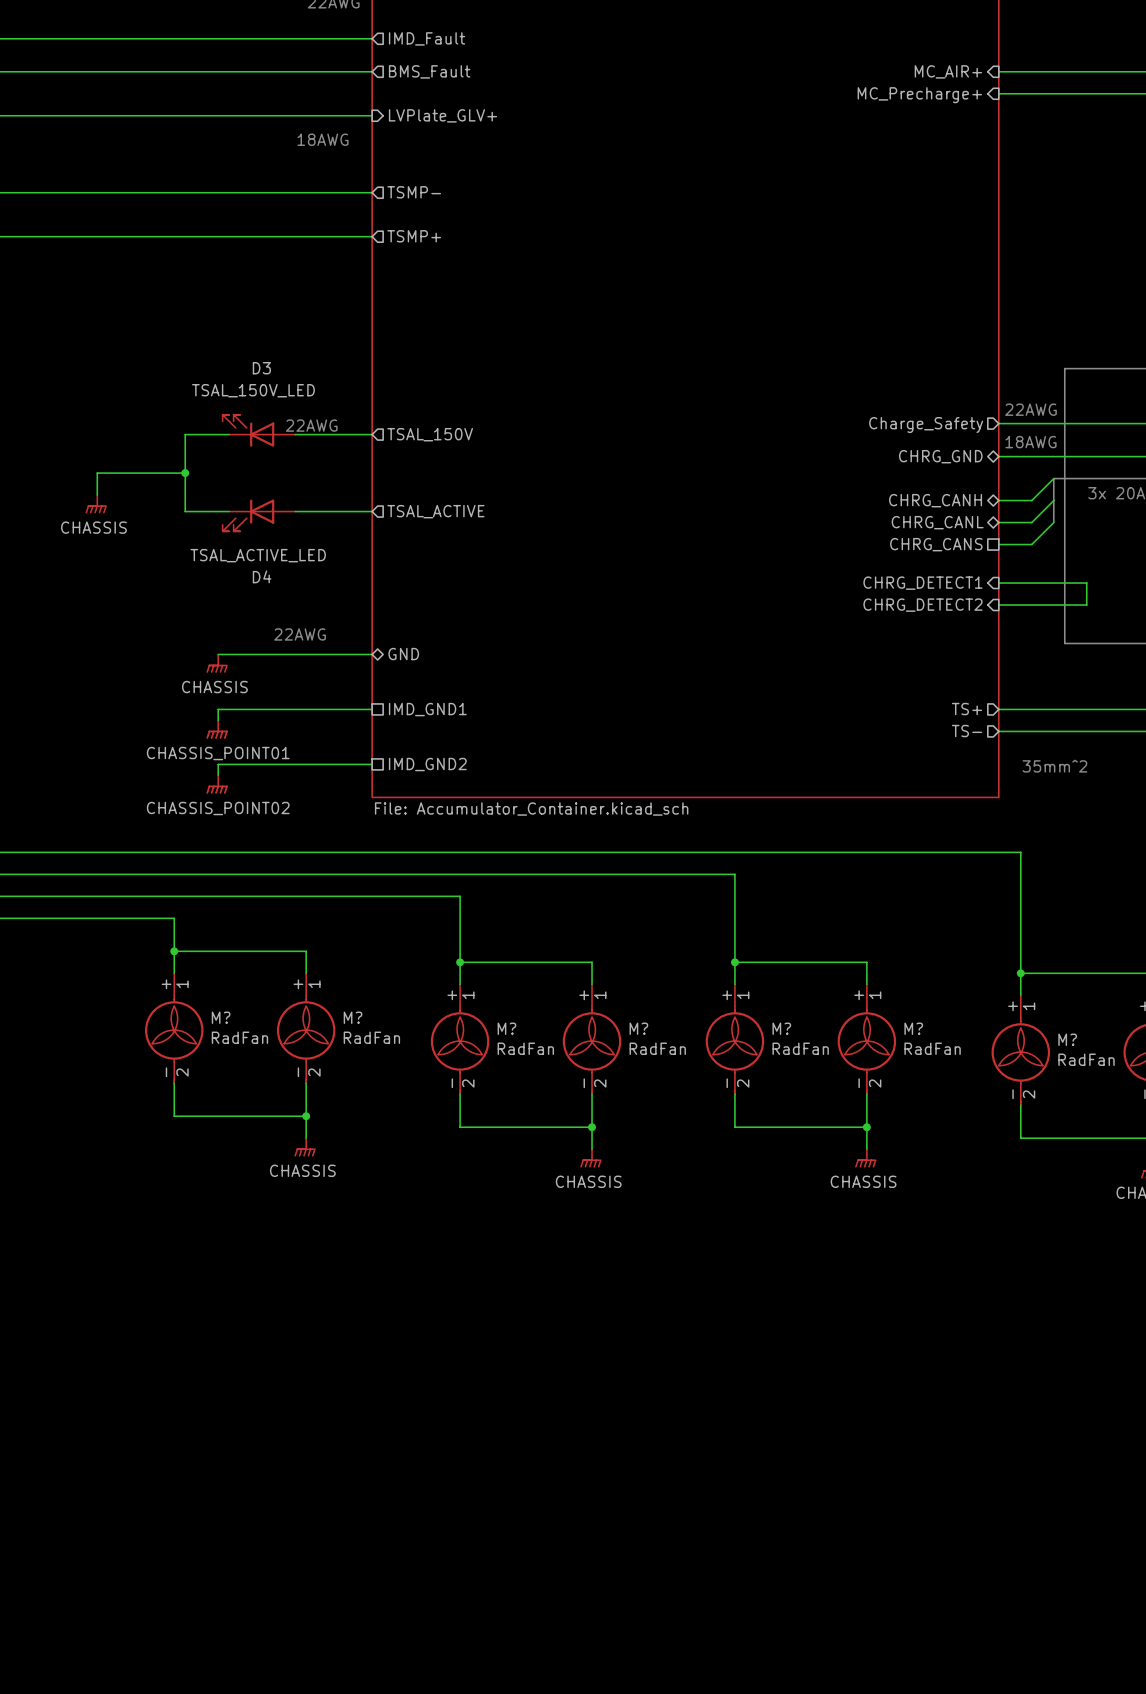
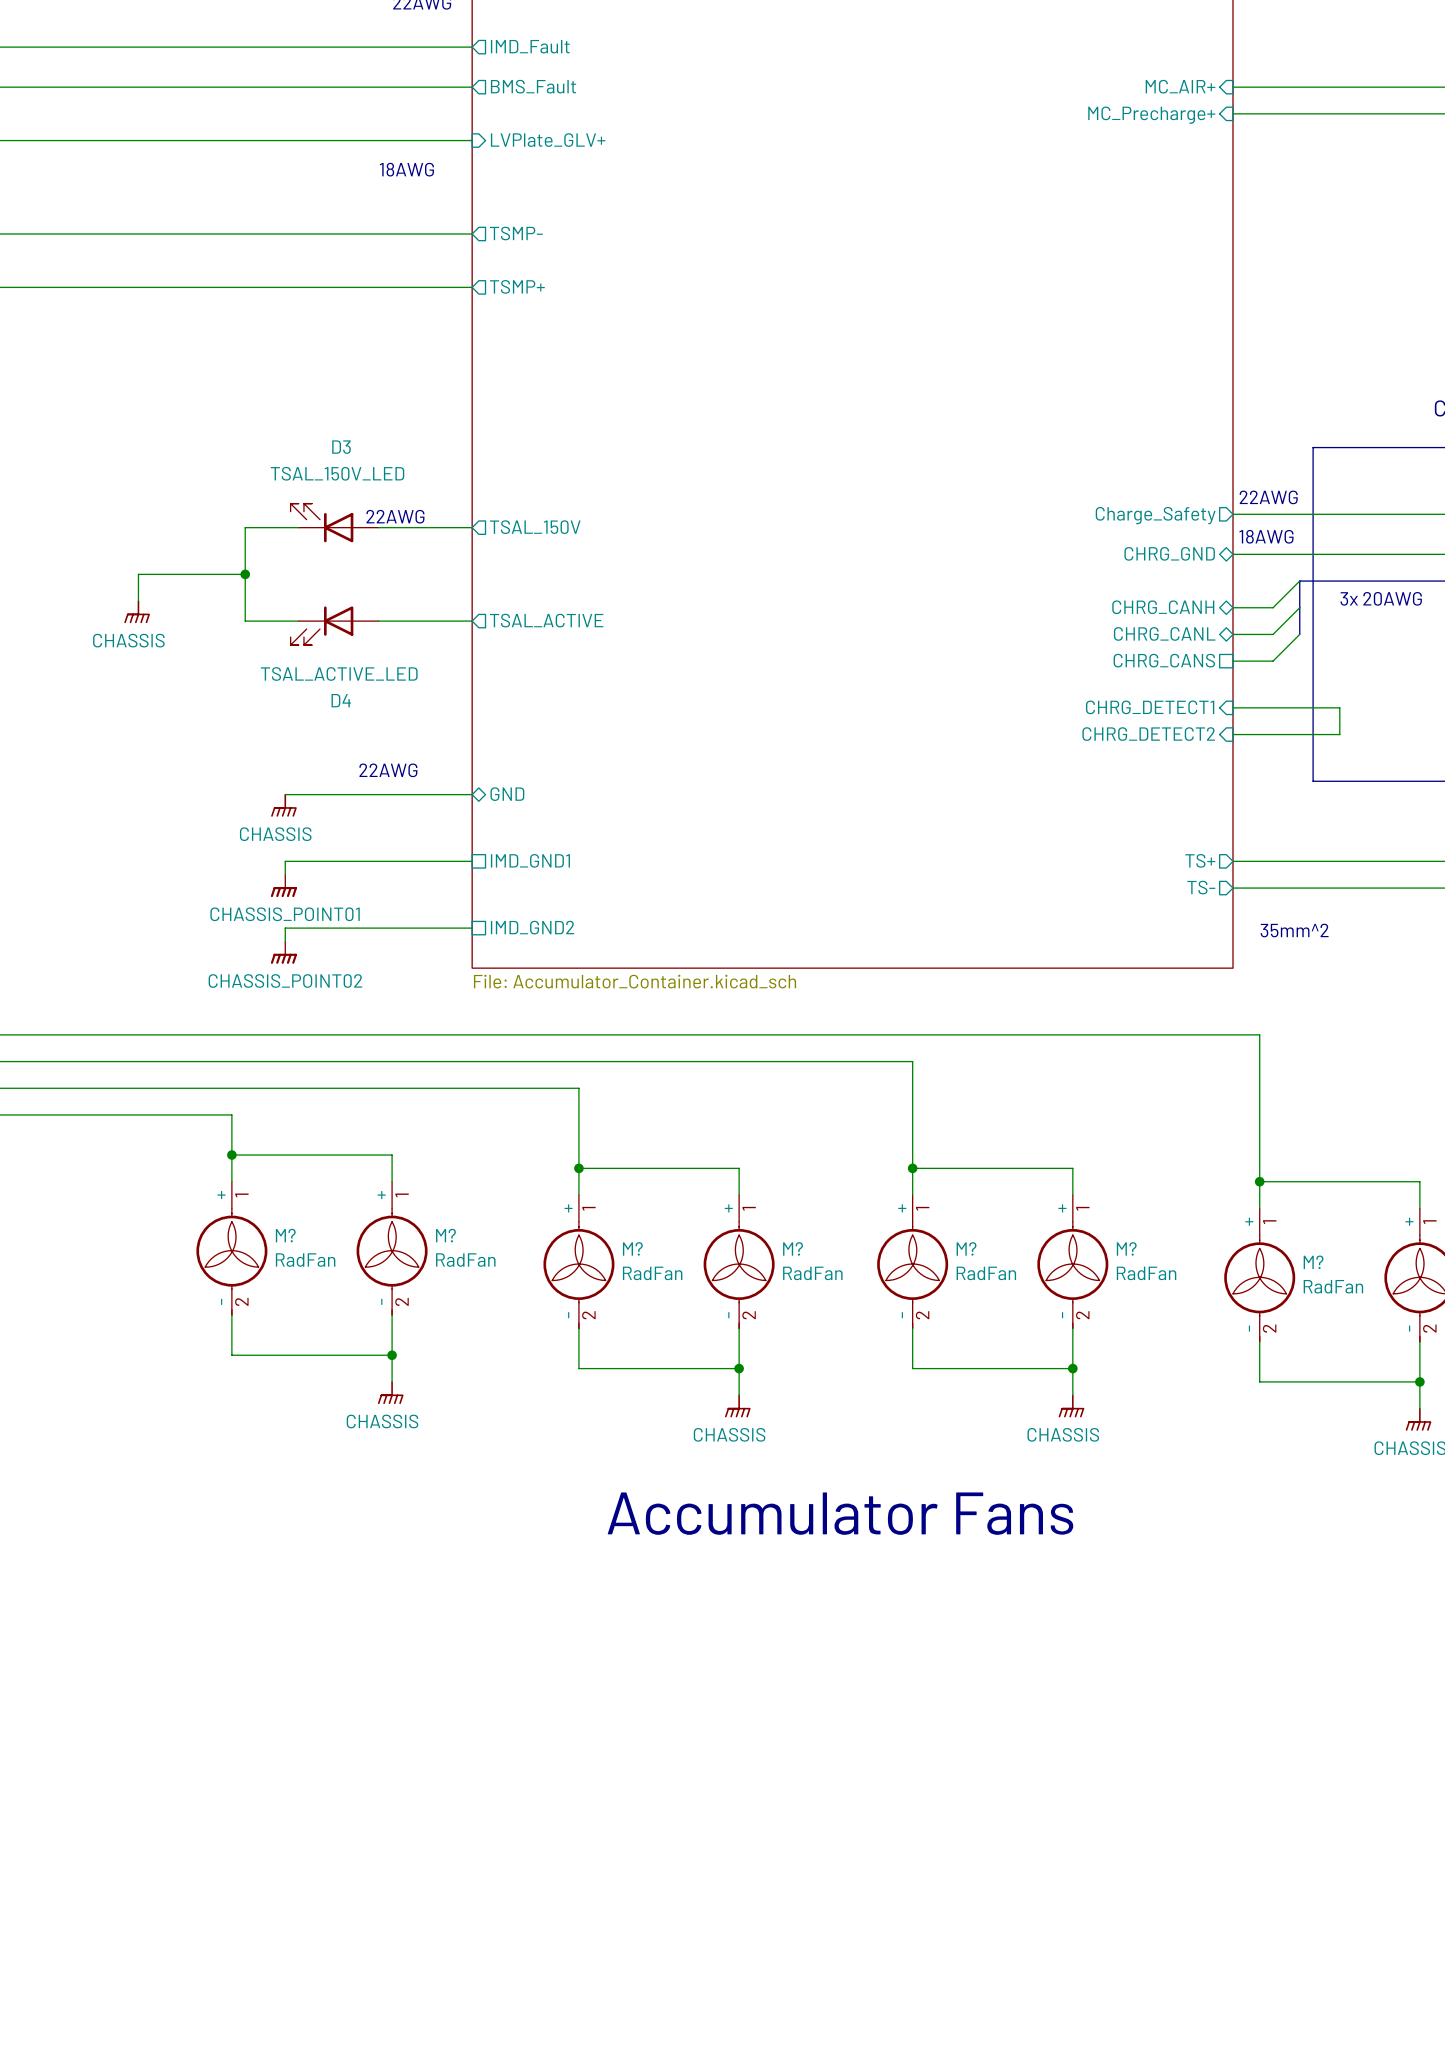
text: none -> Accumulator Fans (840, 1513)

